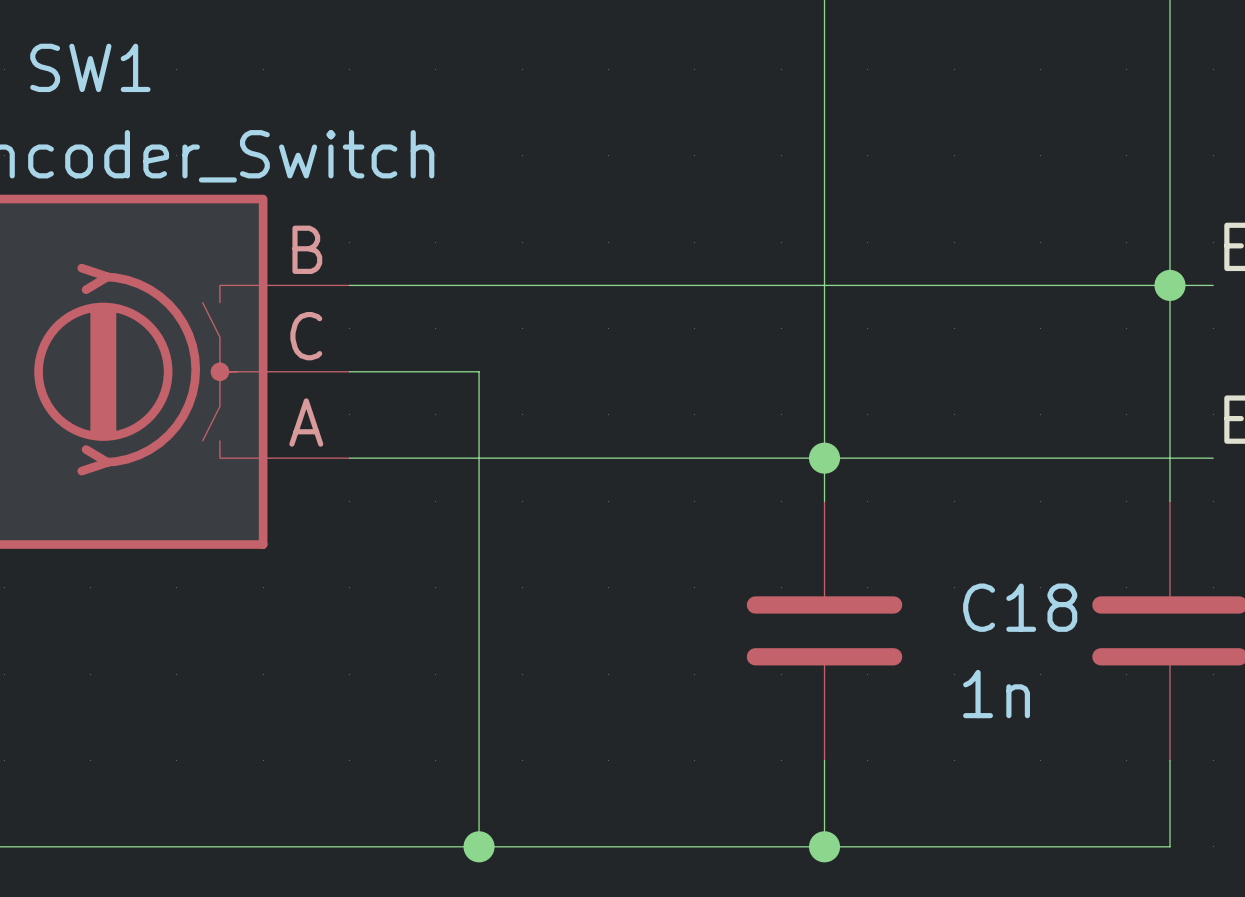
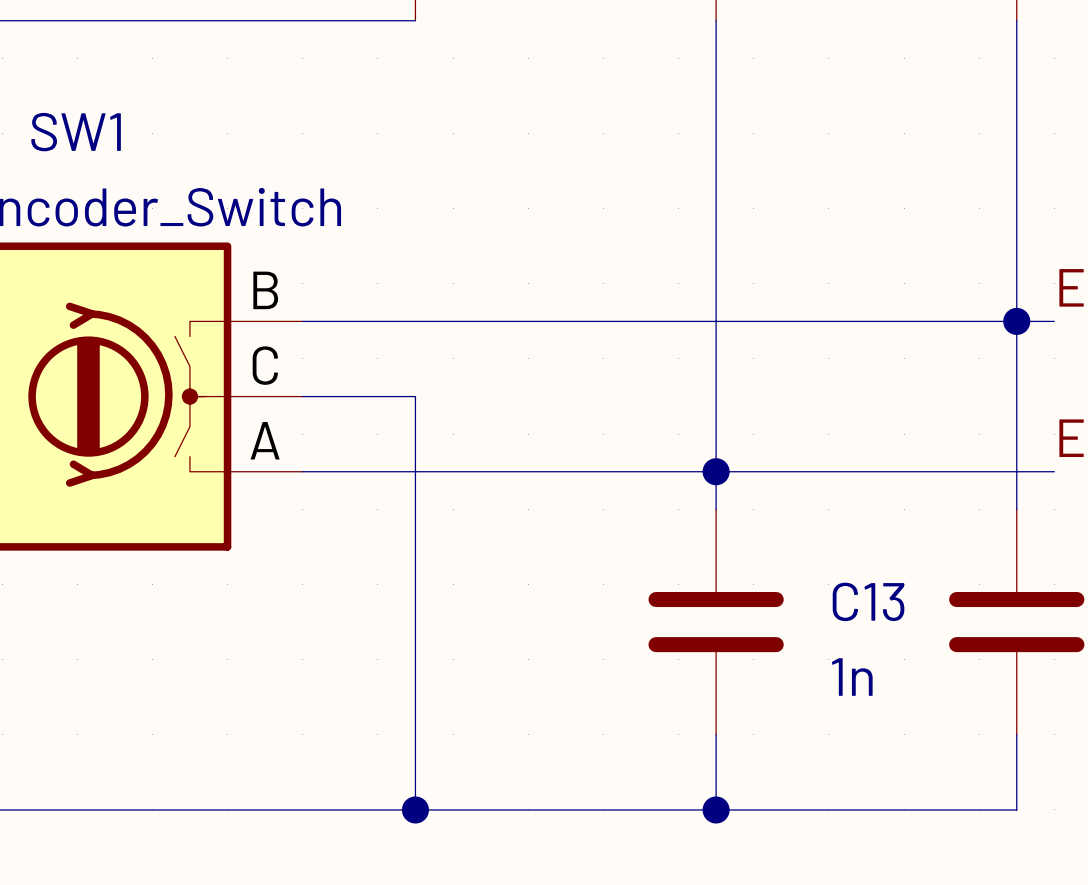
C18 name: C18 (1020, 607) -> C13 (868, 601)

